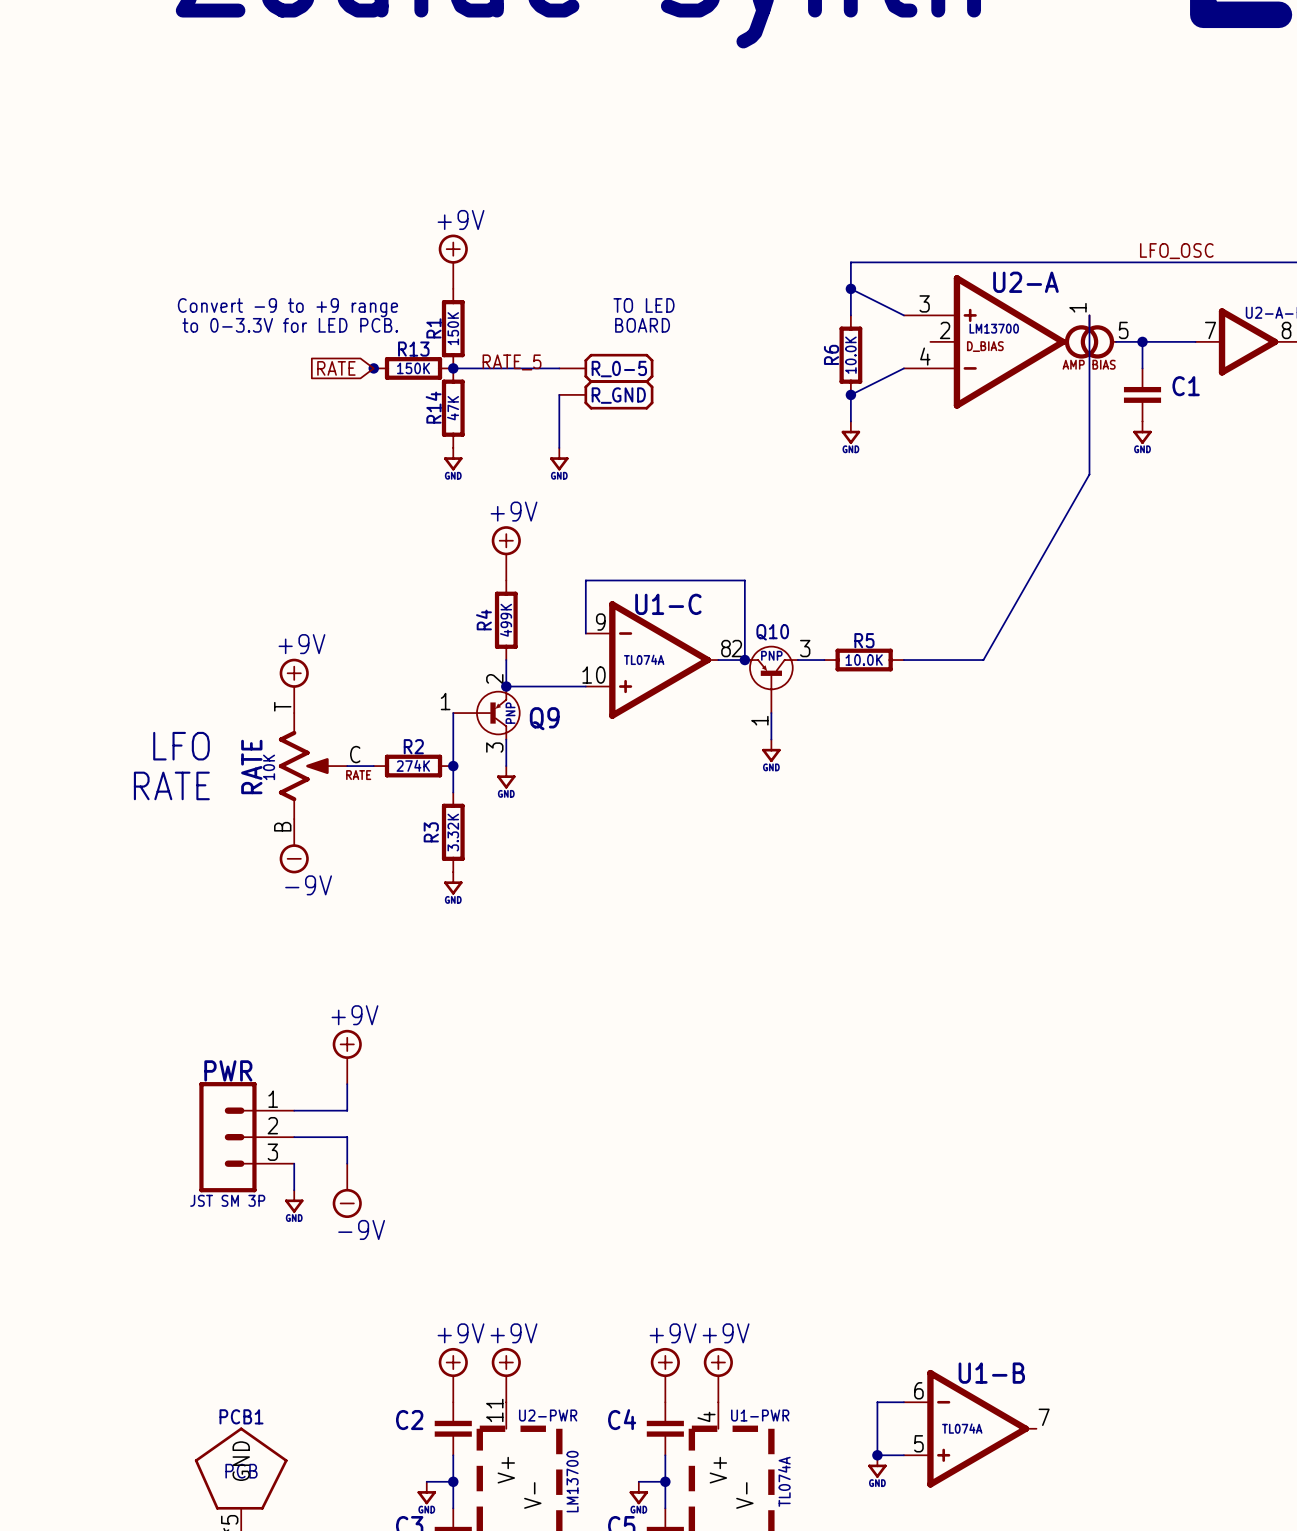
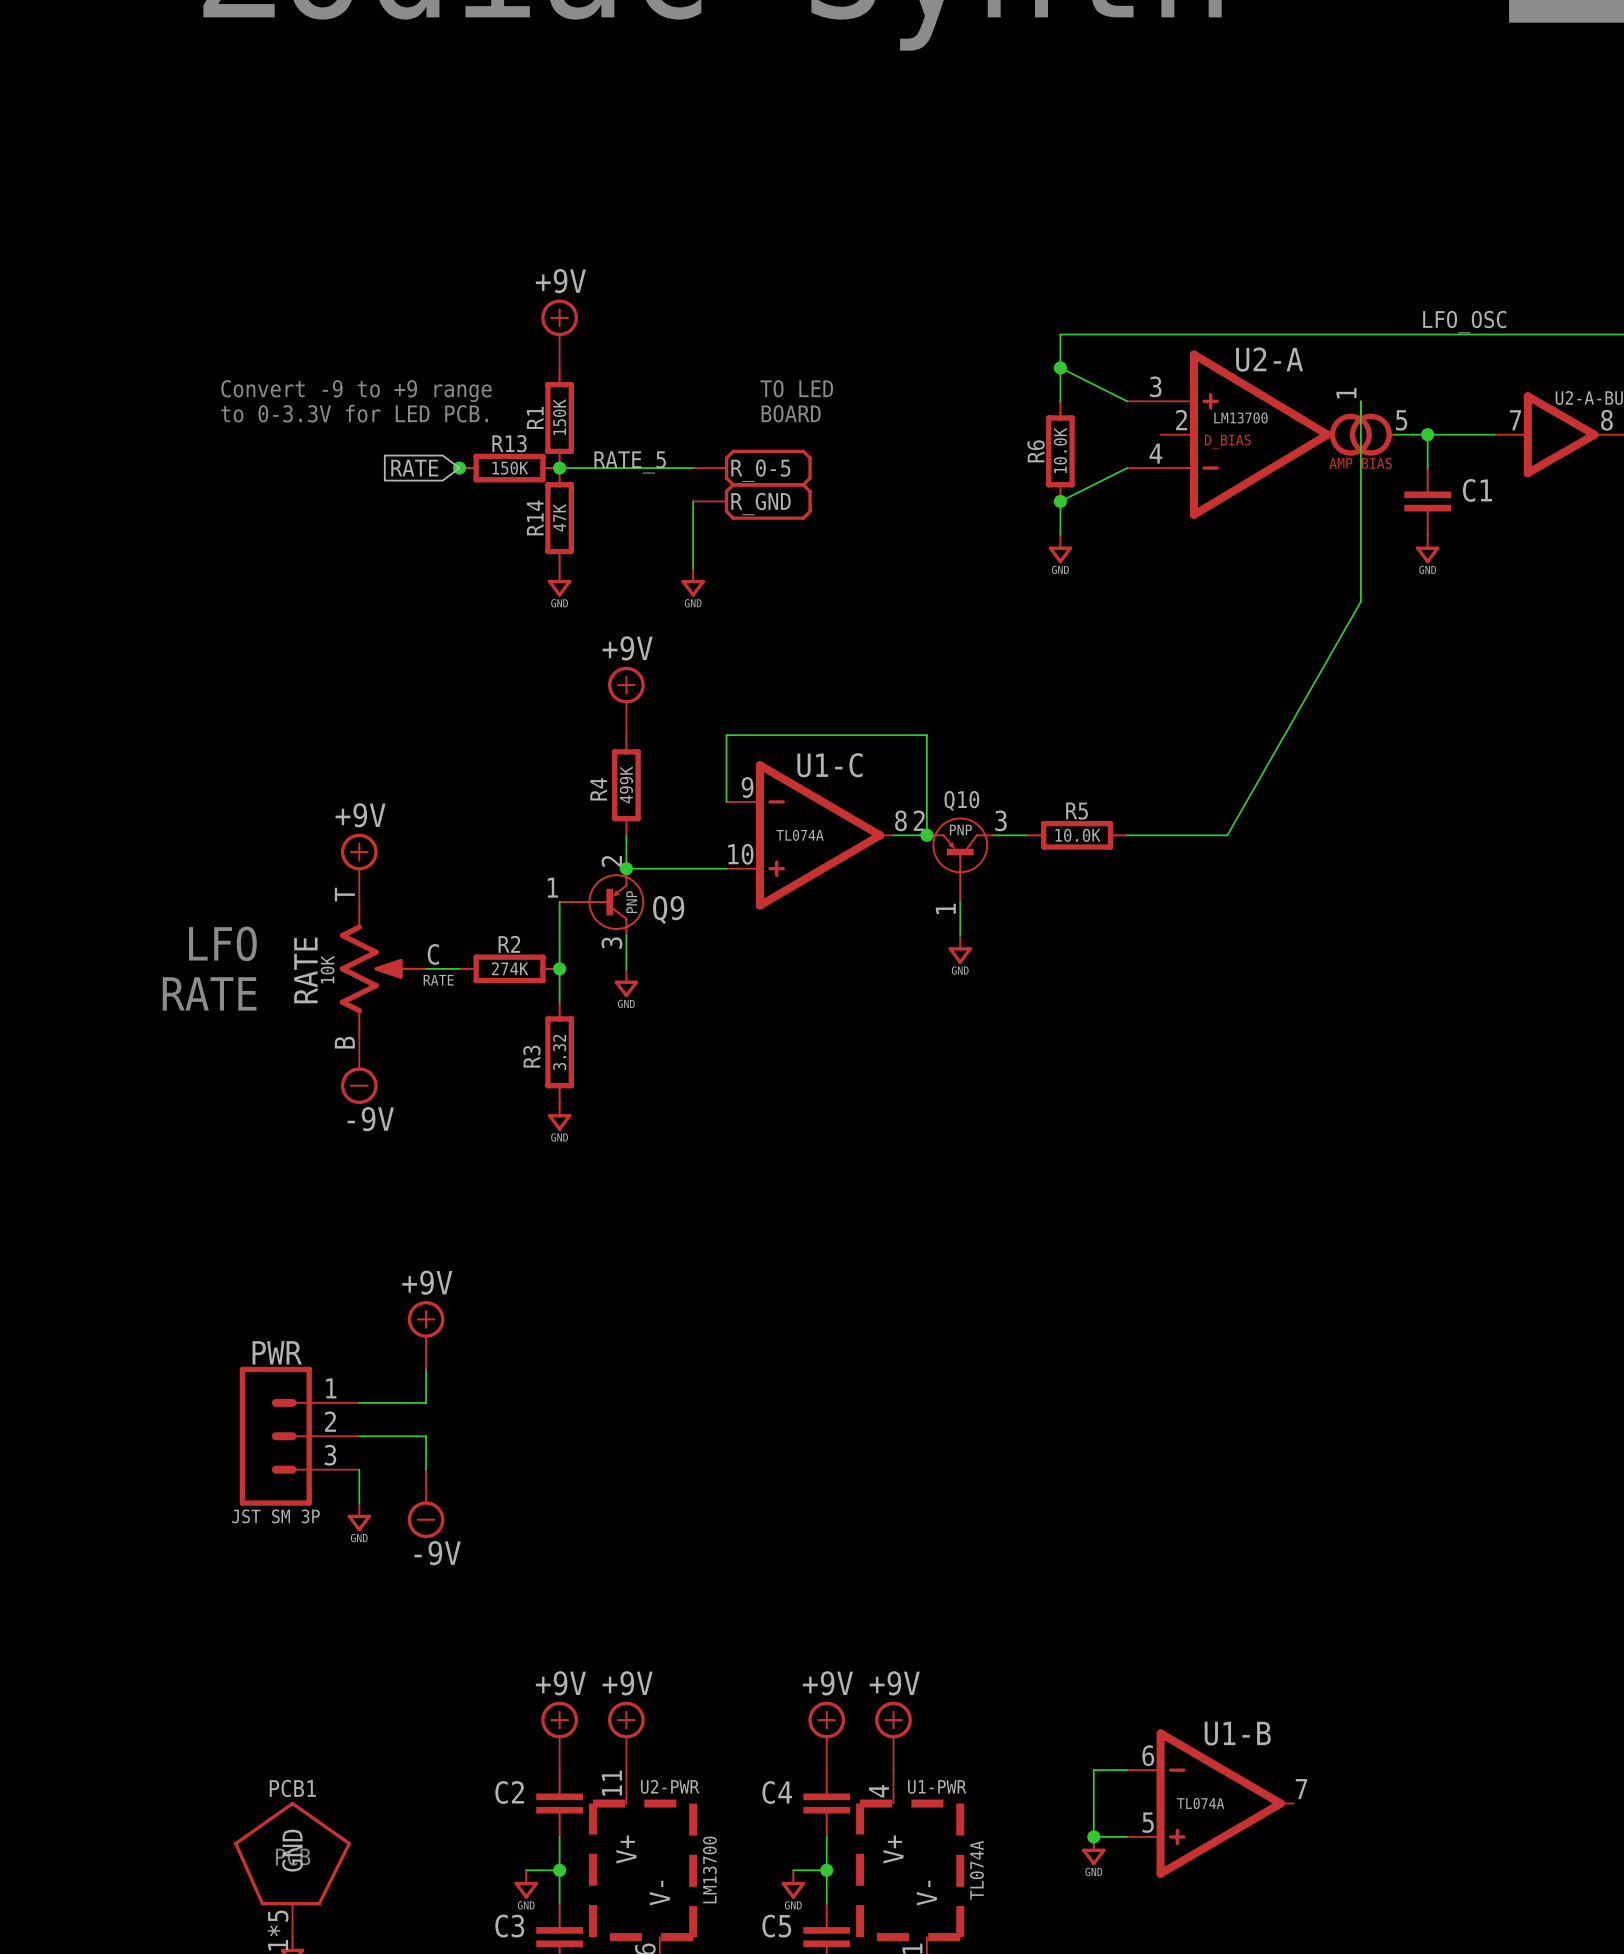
R3 value: 3.32K (453, 832) -> 3.32 (559, 1052)

